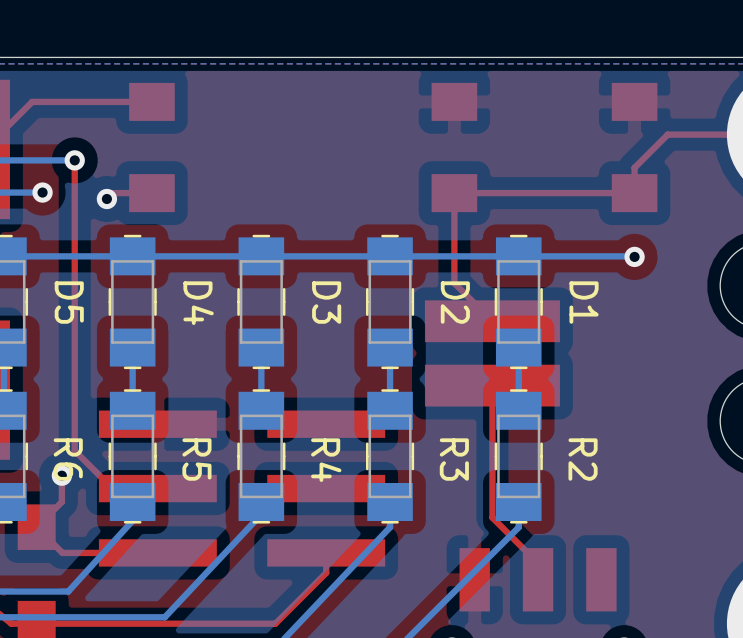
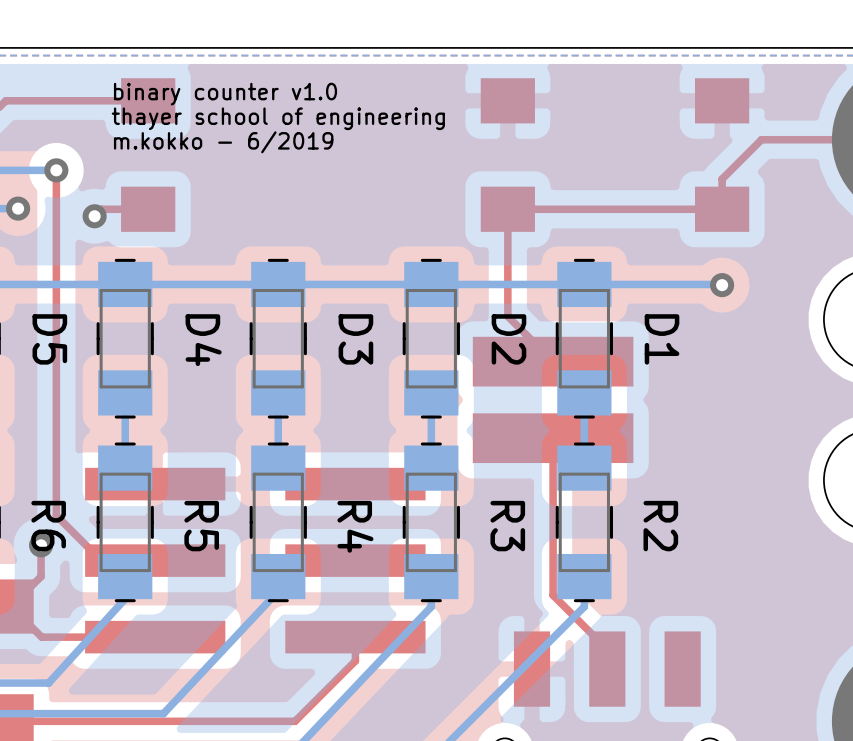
text: none -> binary counter v1.0 (225, 94)
text: none -> thayer school of engineering (278, 118)
text: none -> m.kokko - 6/2019 (223, 142)

